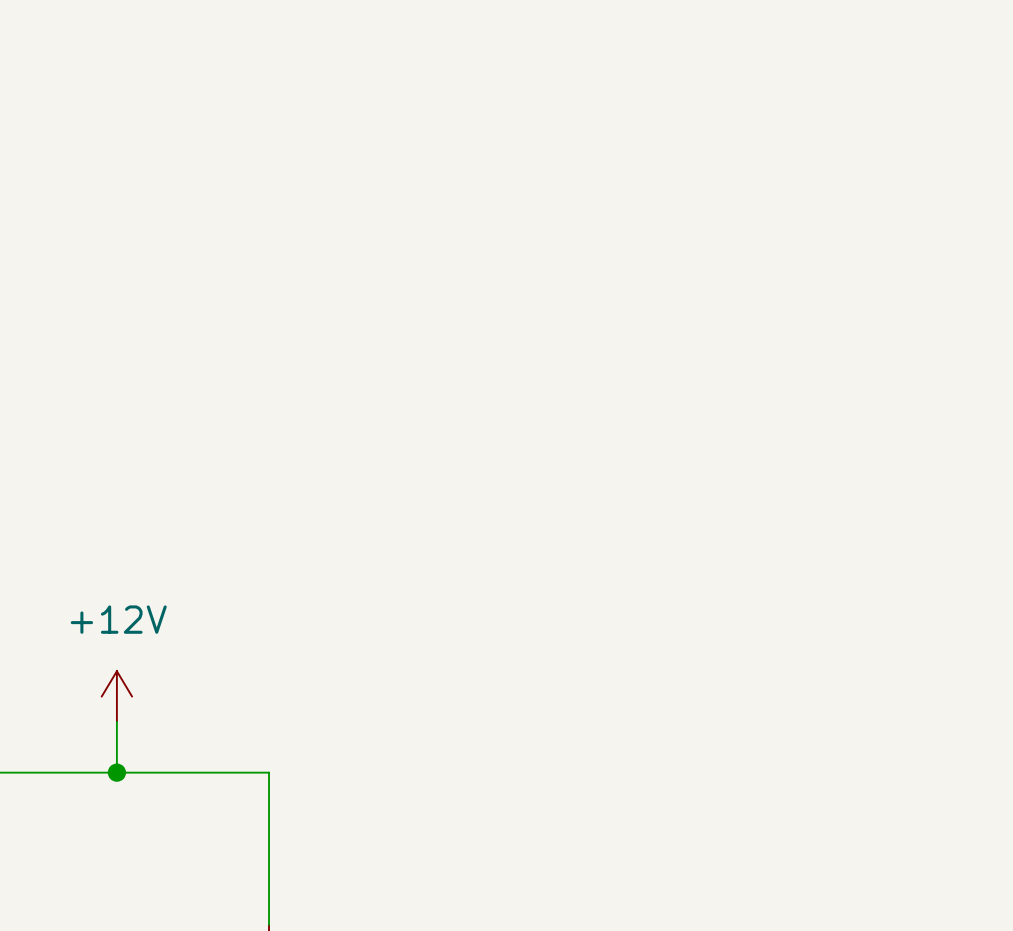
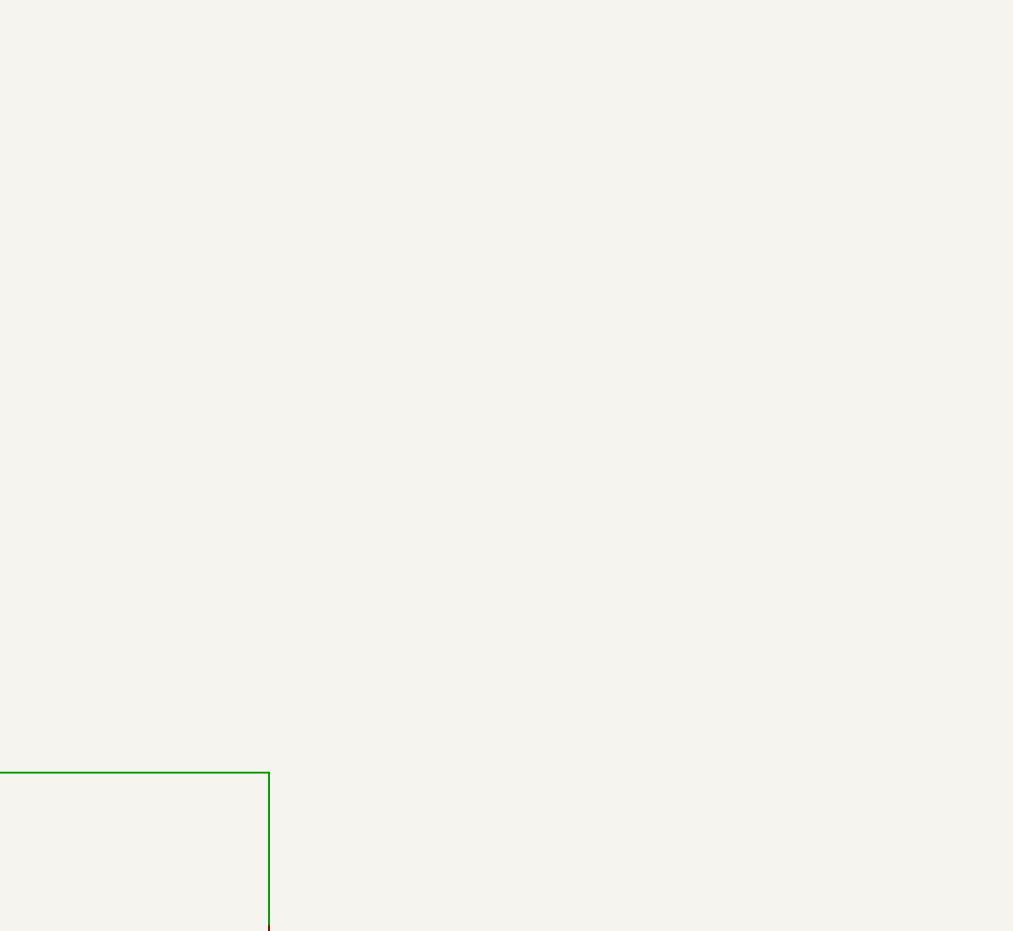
power symbol: +12V (116, 696) -> none
wire: (116, 721) (116, 772) -> none
junction: (116, 772) -> none

